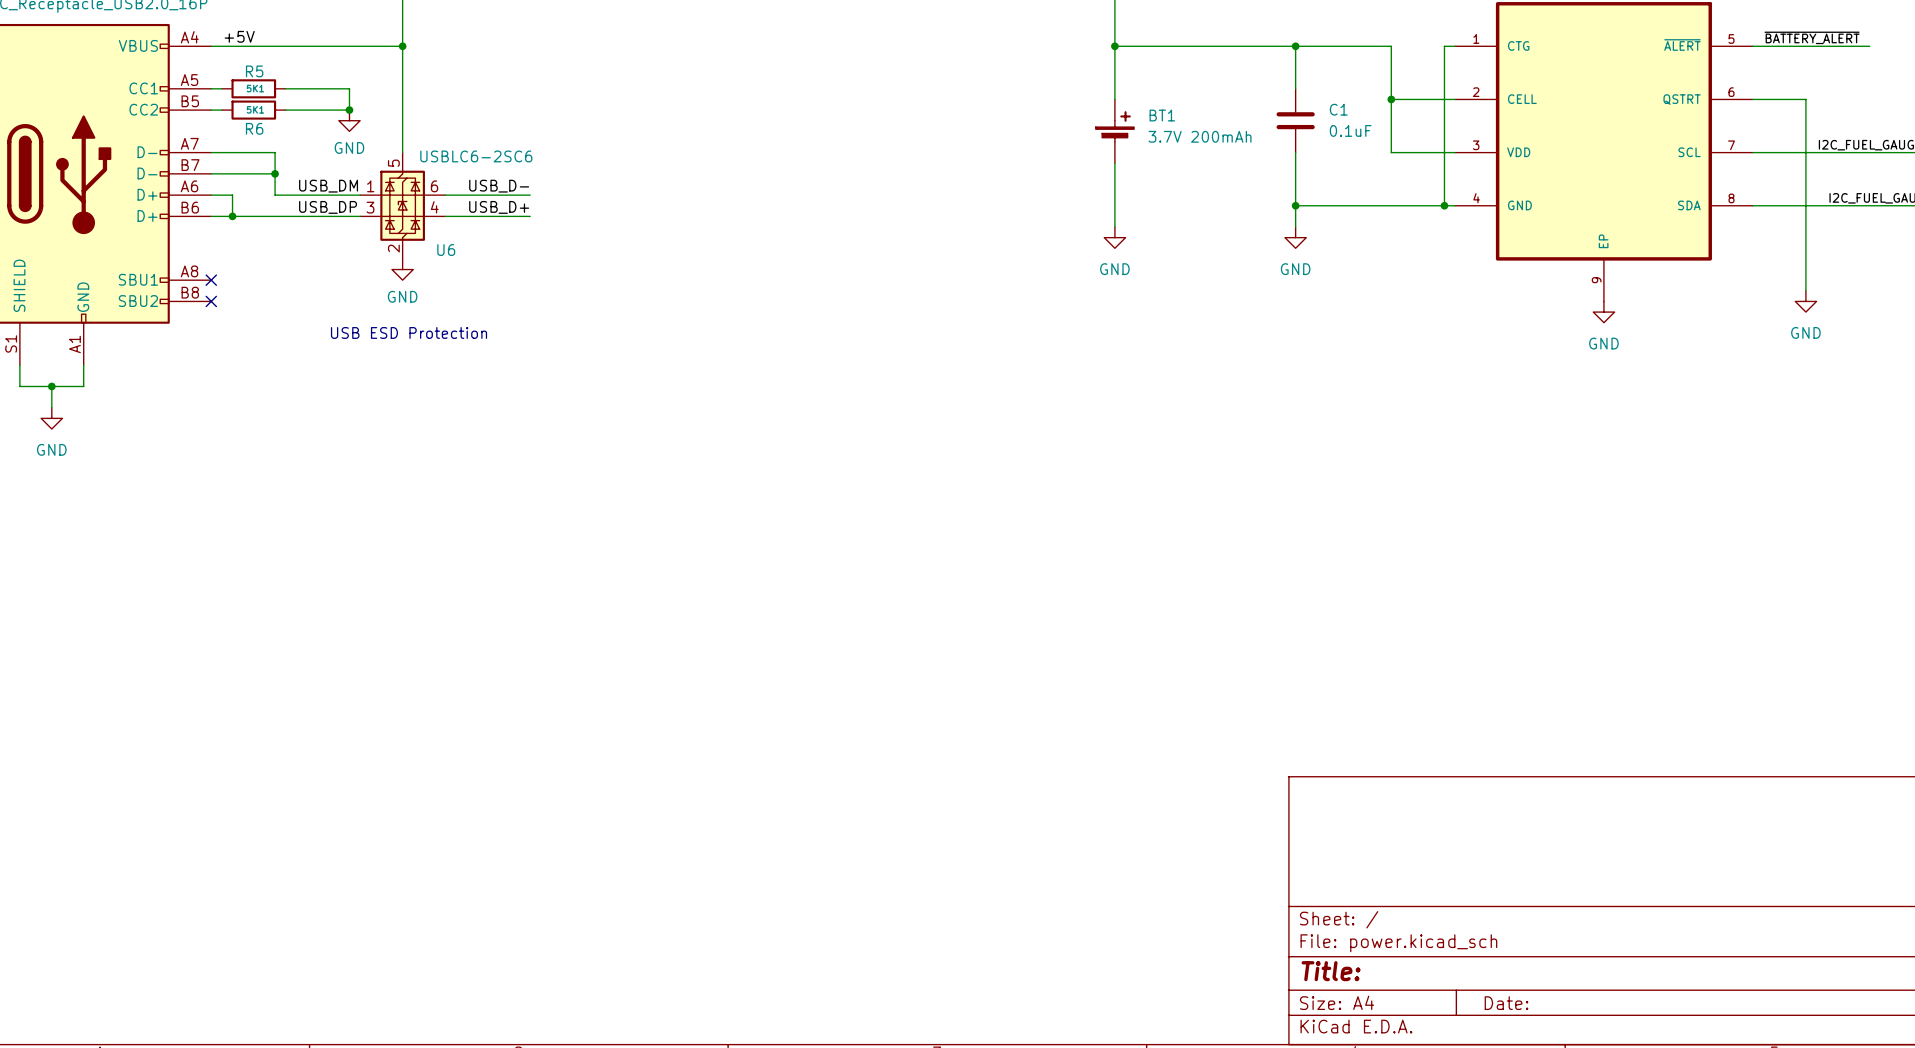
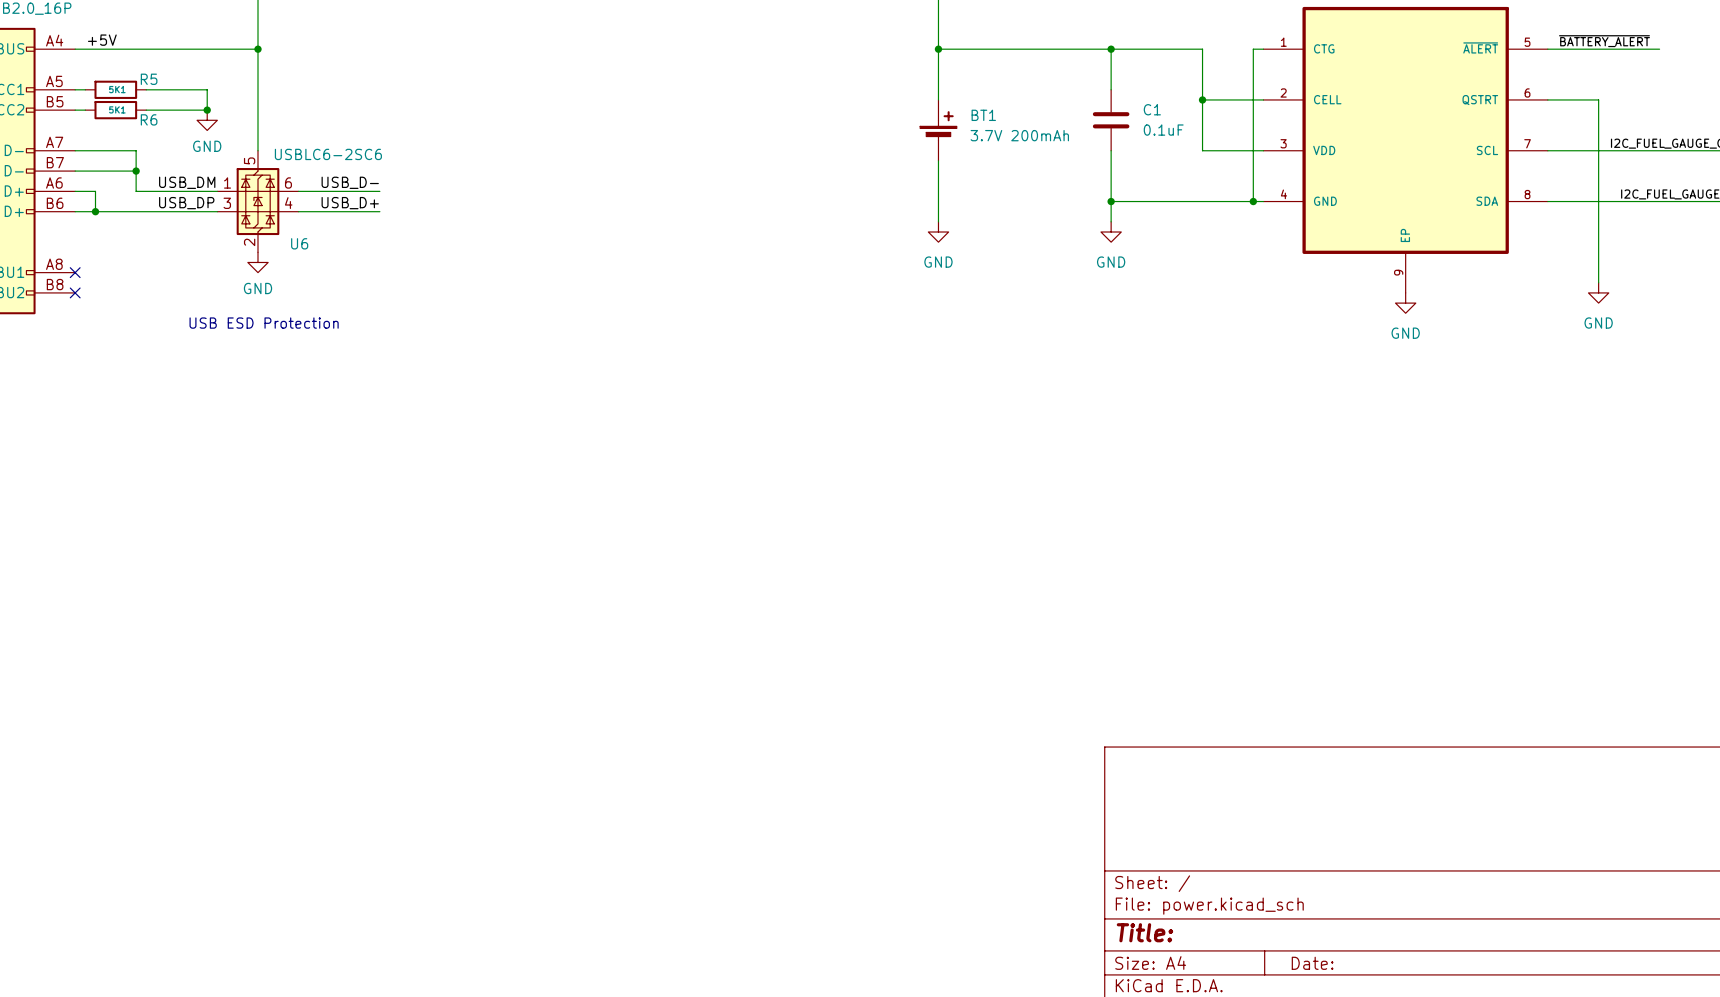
R5 name position: R5 (254, 71) -> R5 (149, 79)
R6 name position: R6 (254, 128) -> R6 (149, 119)

